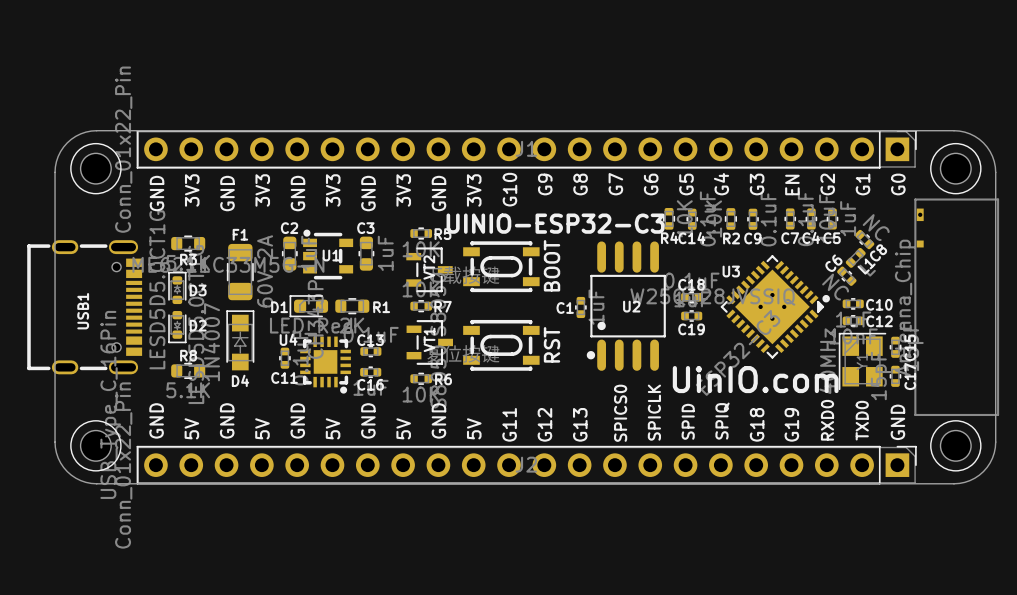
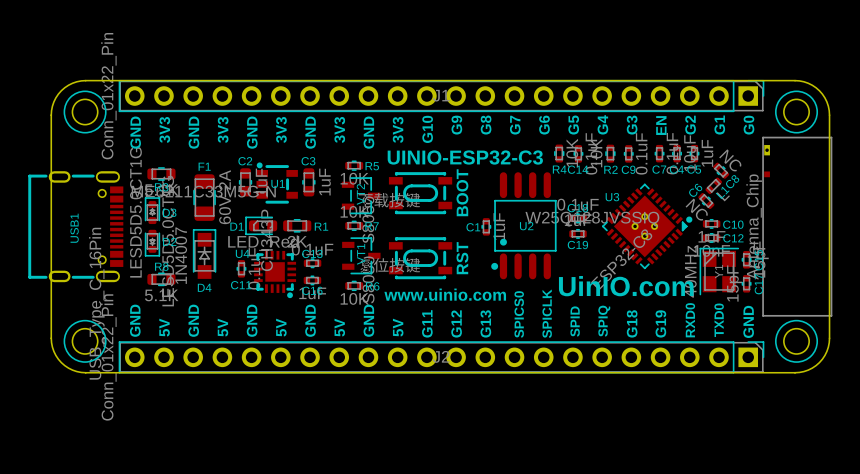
text: none -> www.uinio.com (445, 294)

